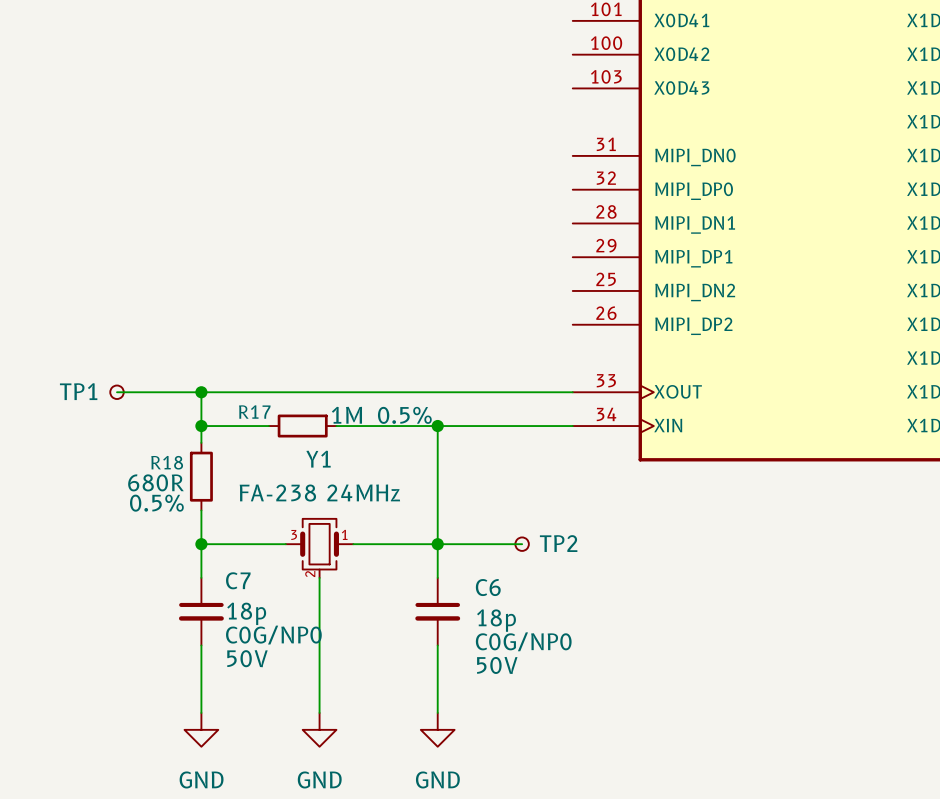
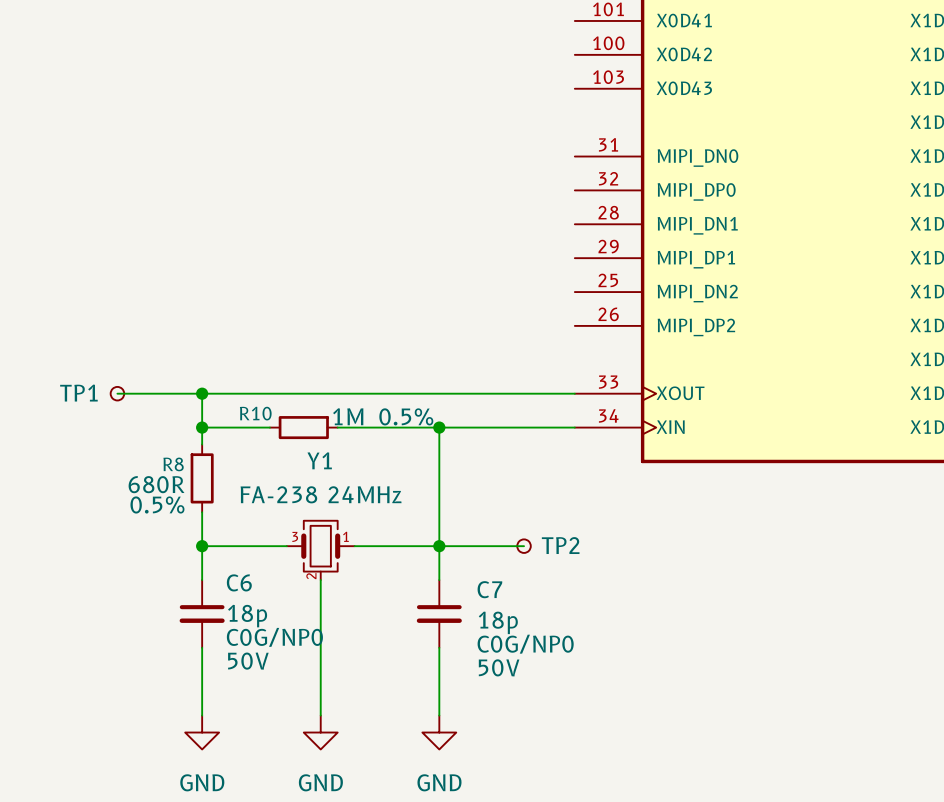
R17 name: R17 (254, 412) -> R10 (255, 413)
R18 name: R18 (167, 462) -> R8 (173, 464)
C7 name: C7 (238, 580) -> C6 (239, 582)
C6 name: C6 (488, 587) -> C7 (489, 589)

